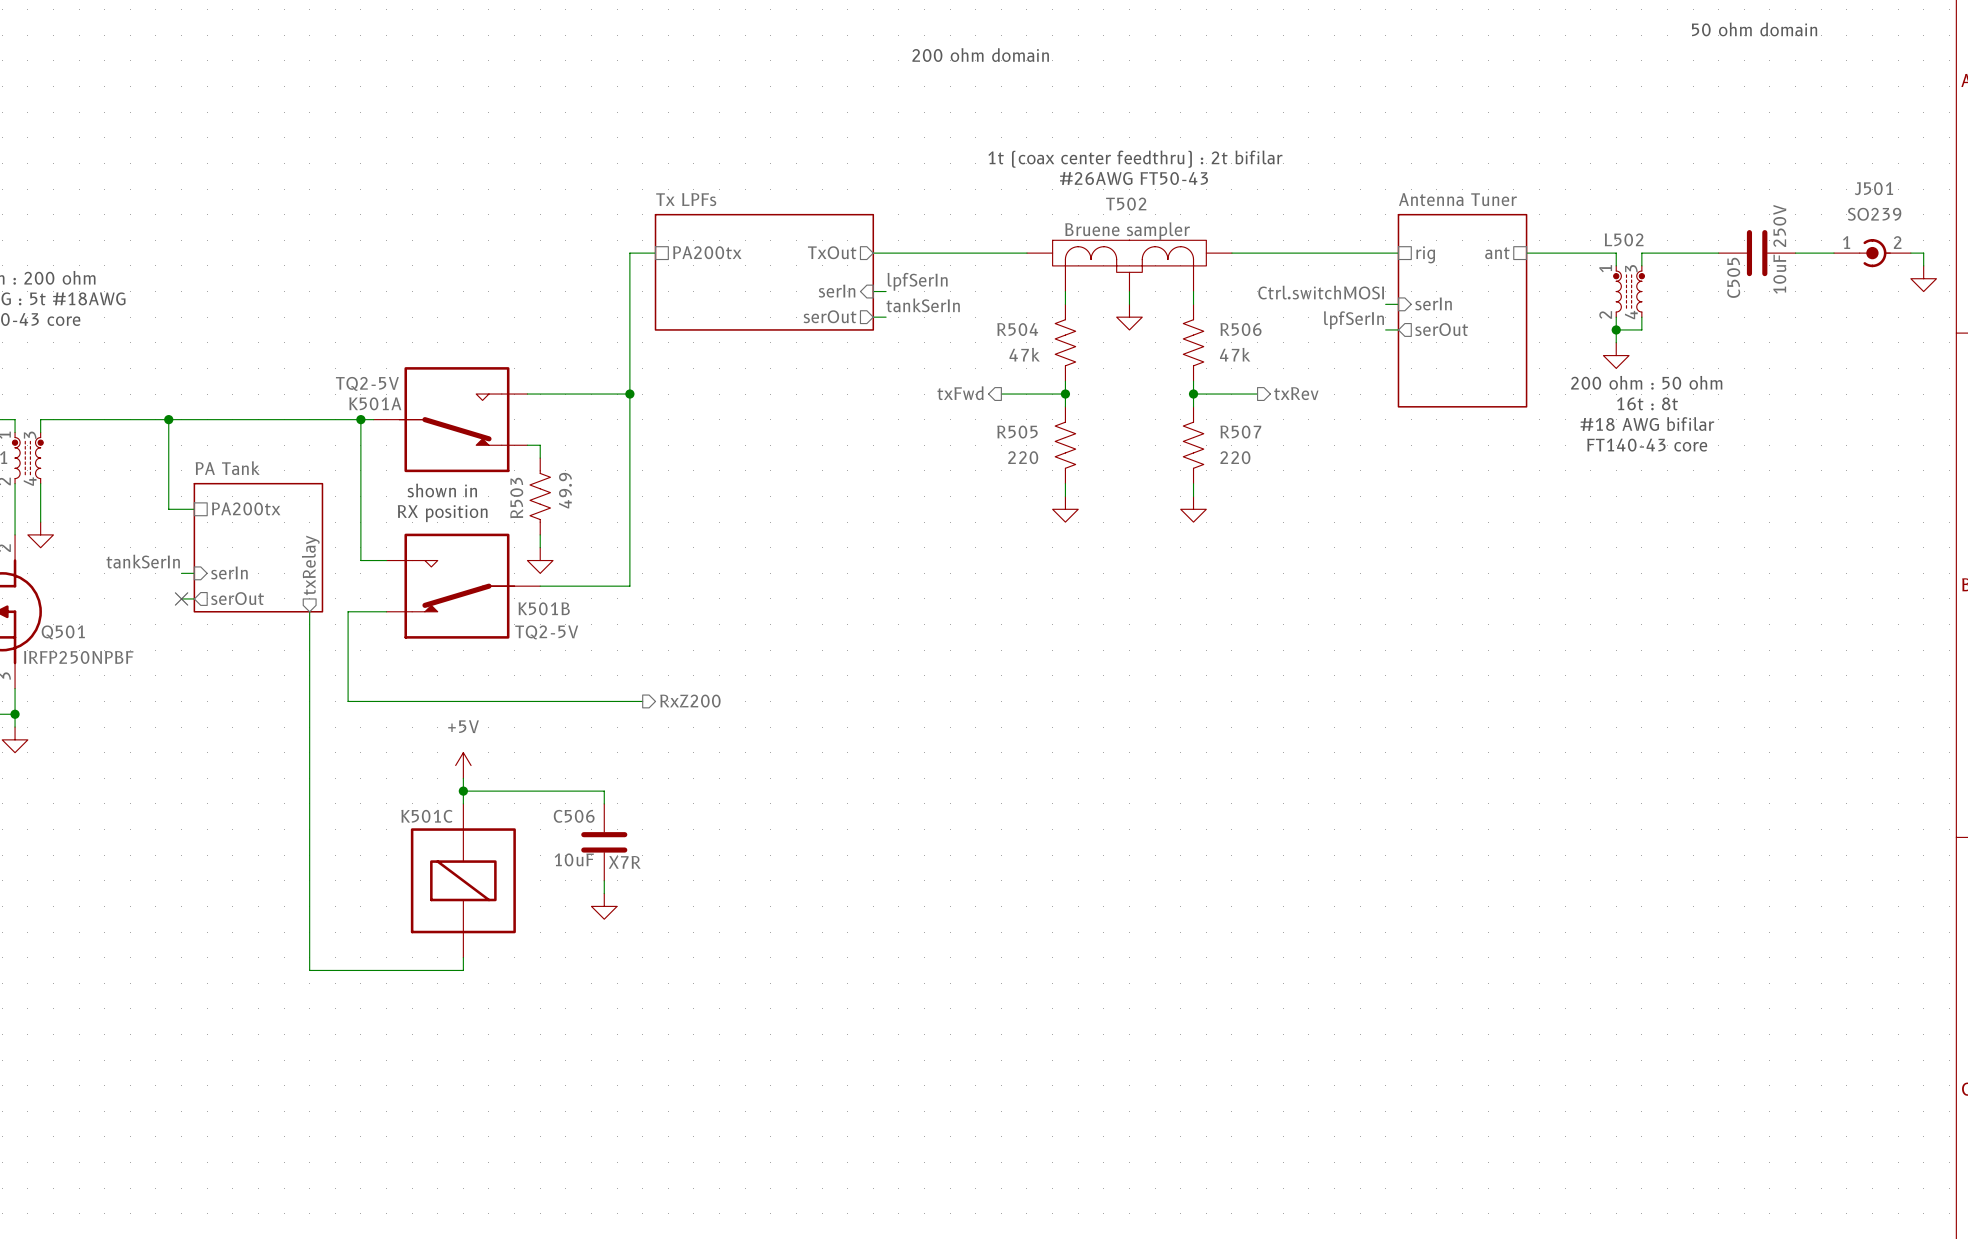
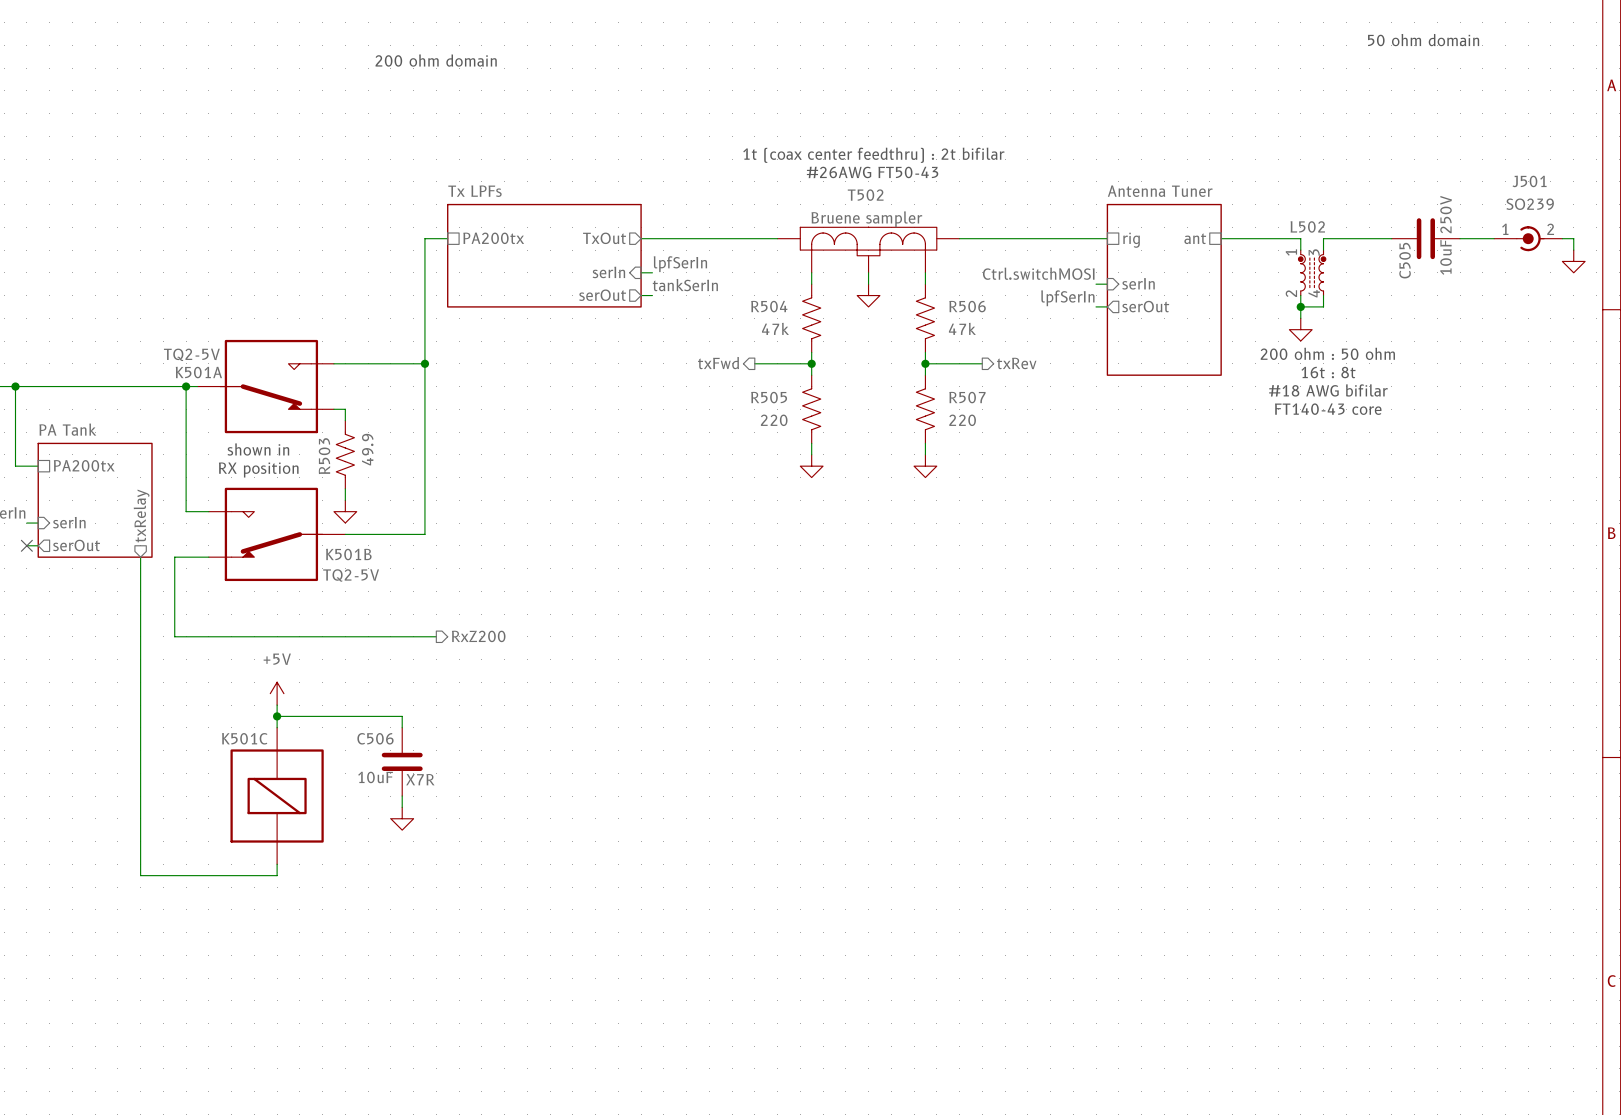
text: none -> 200 ohm domain (436, 60)
text: 200 ohm domain (980, 55) -> none

